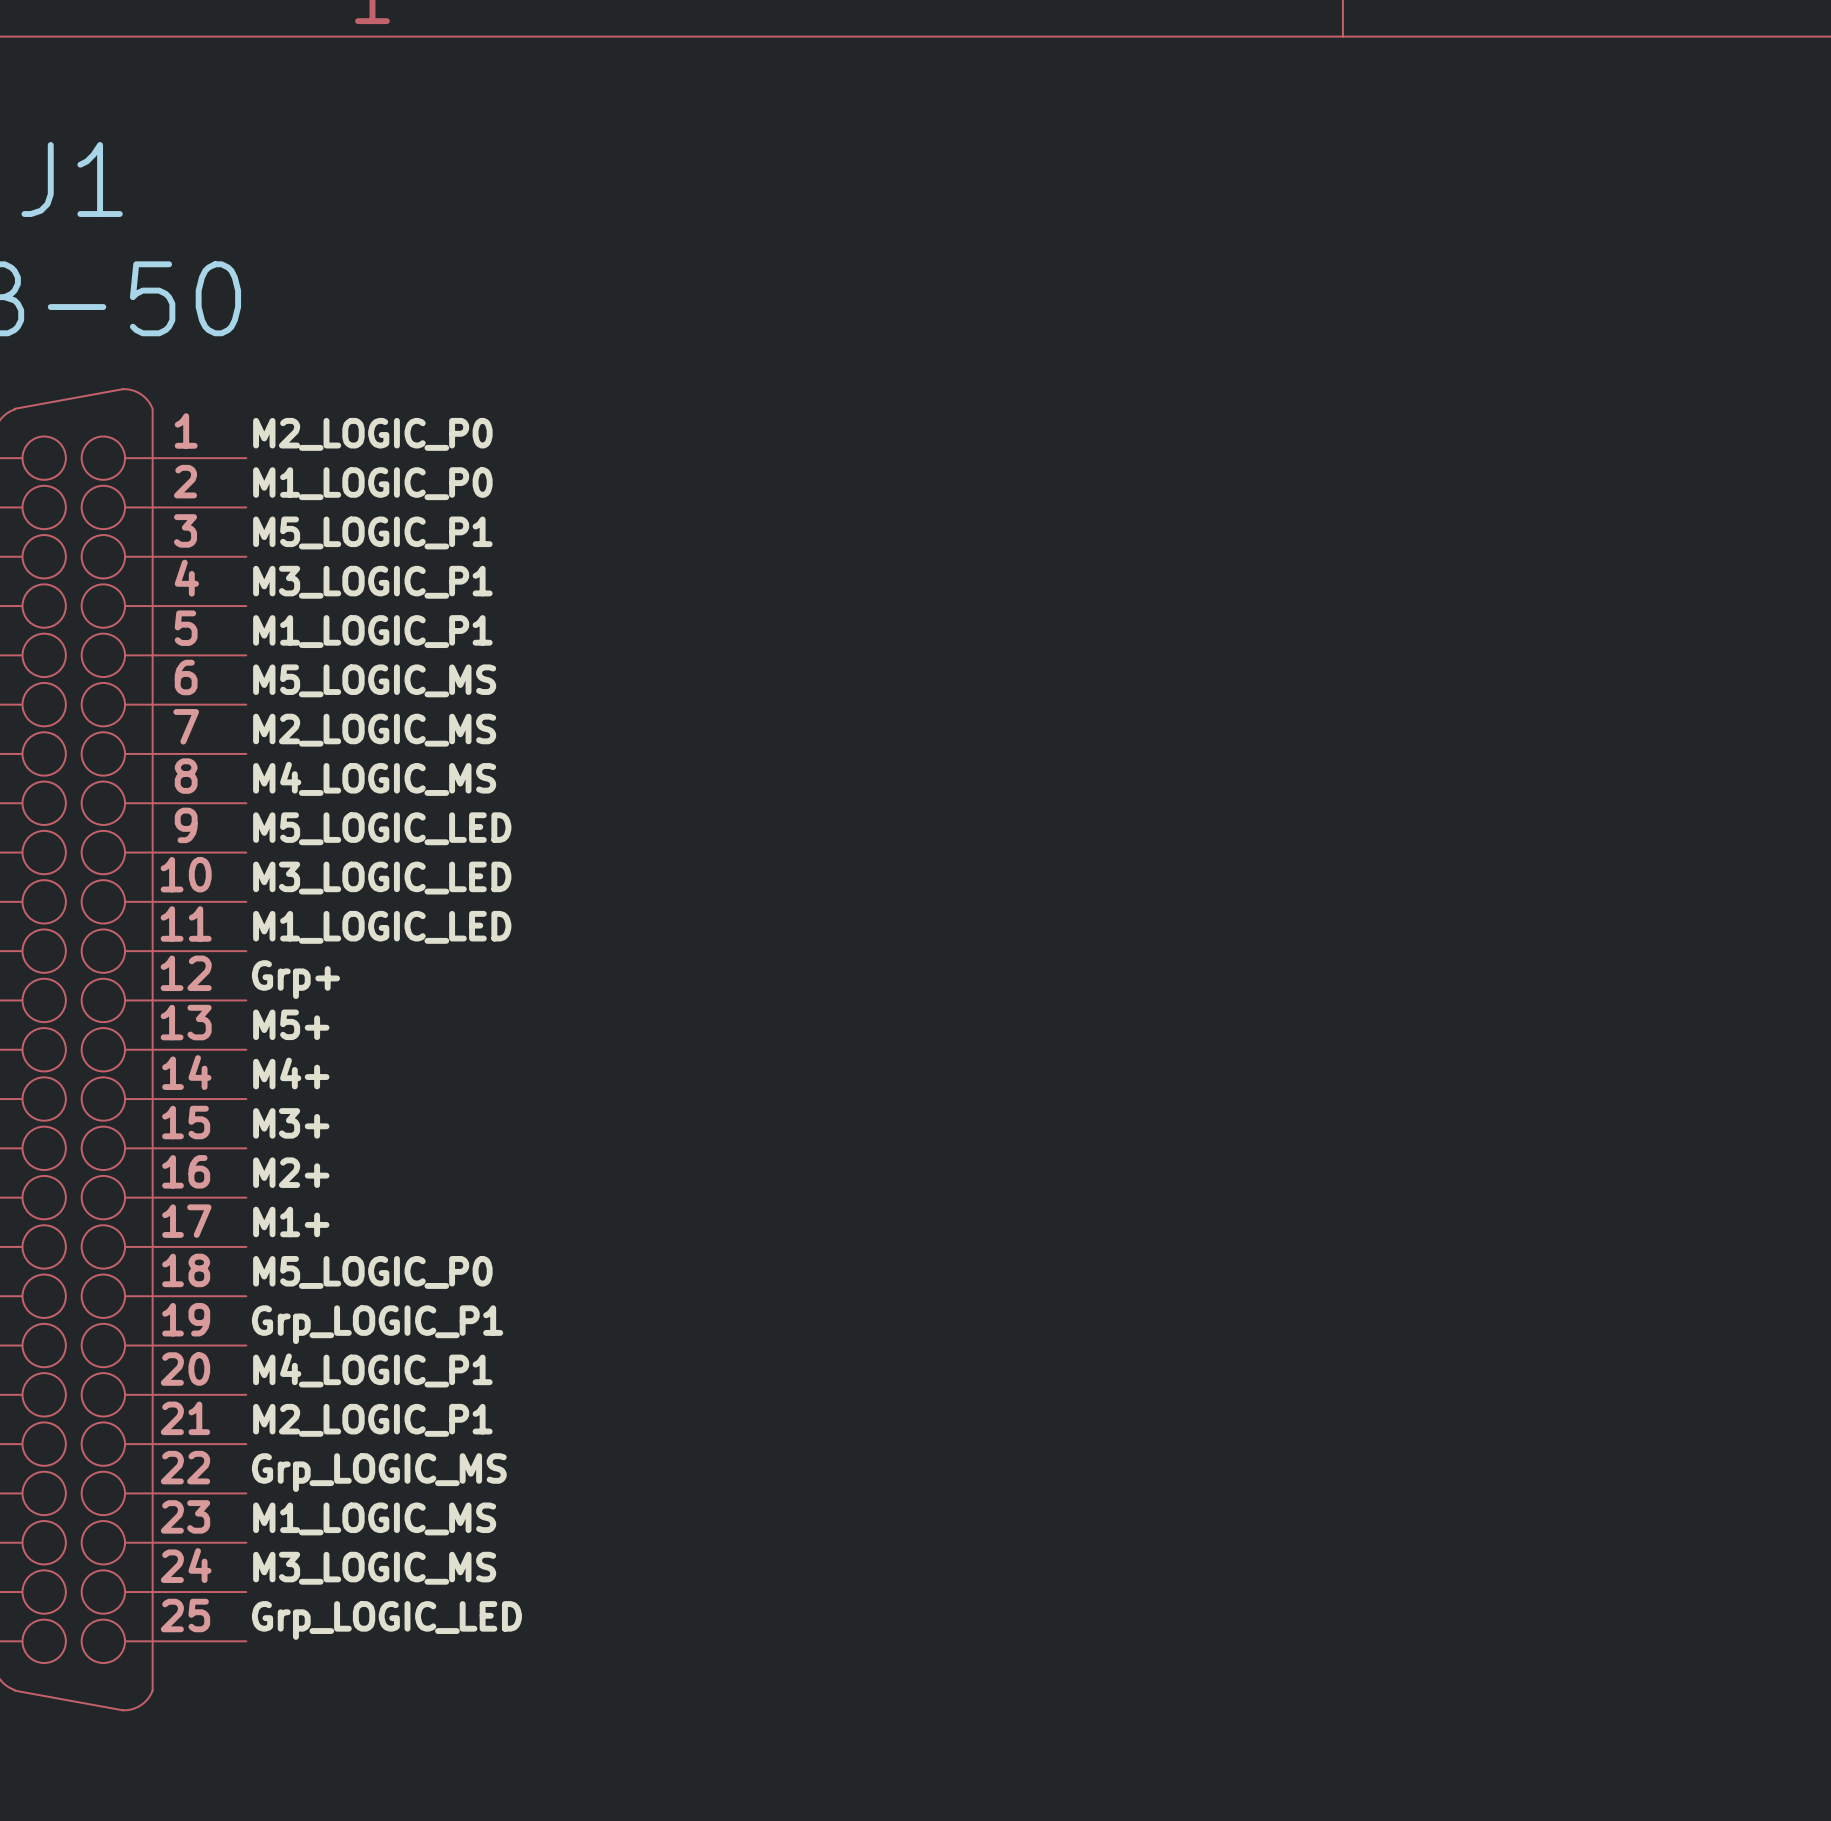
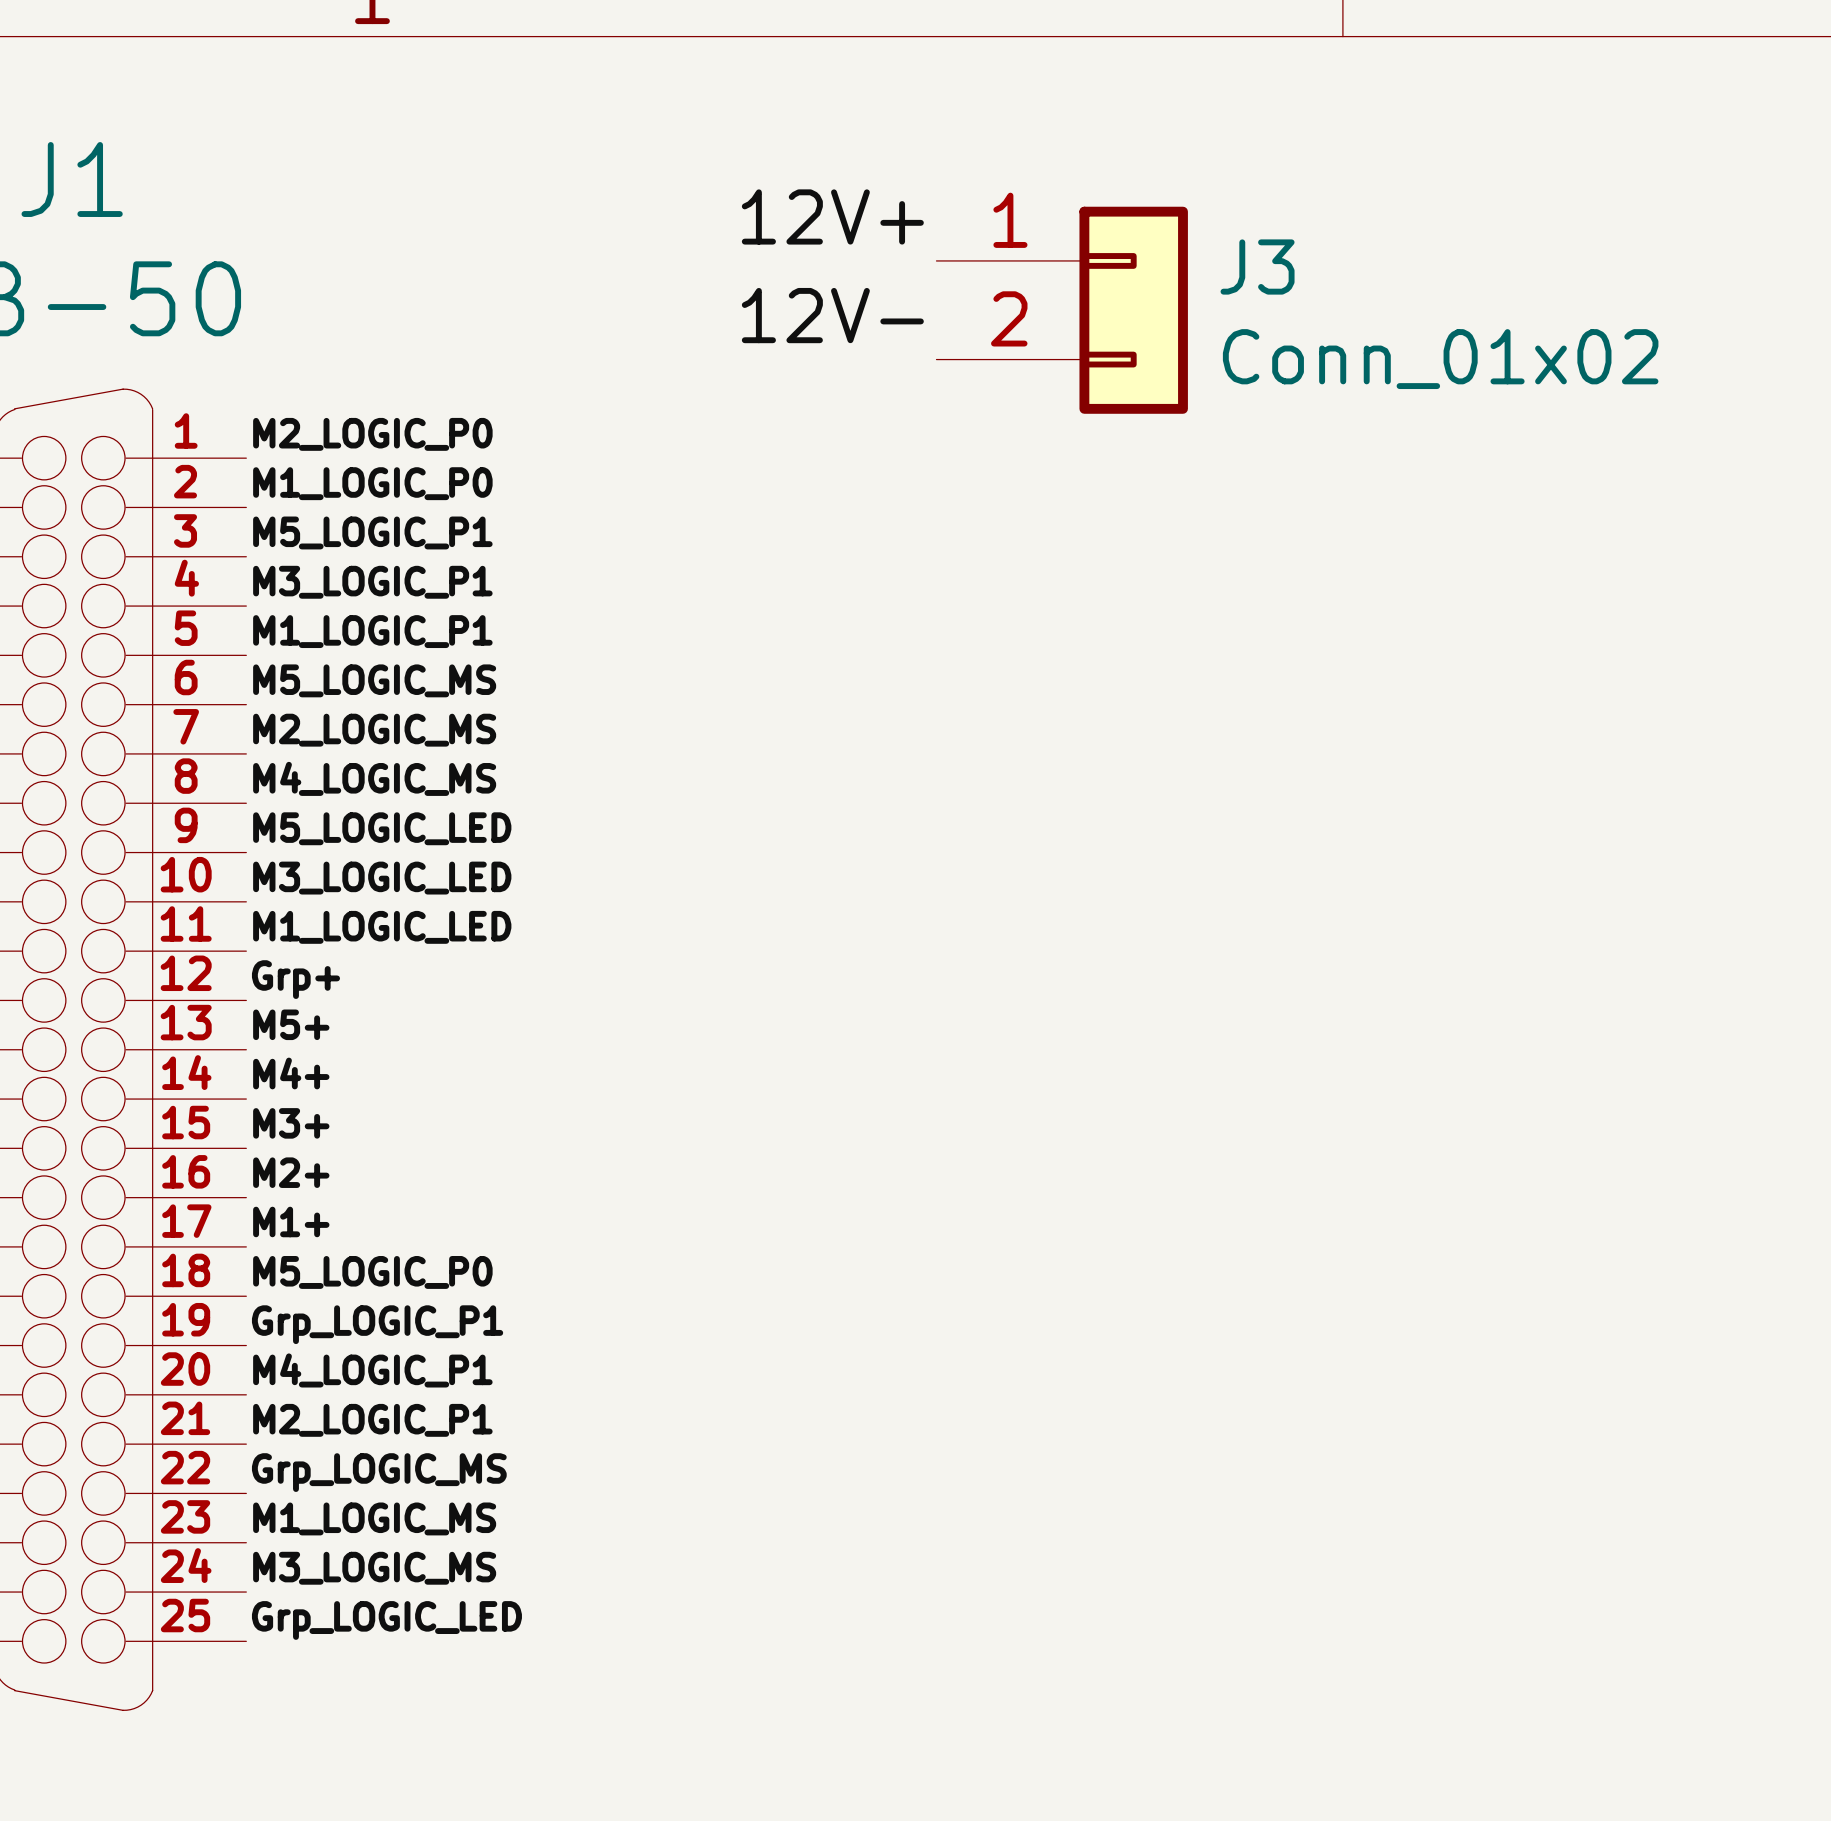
label: none -> 12V+ (832, 216)
J3: none -> Conn_01x02 (1062, 310)
label: none -> 12V- (832, 315)

